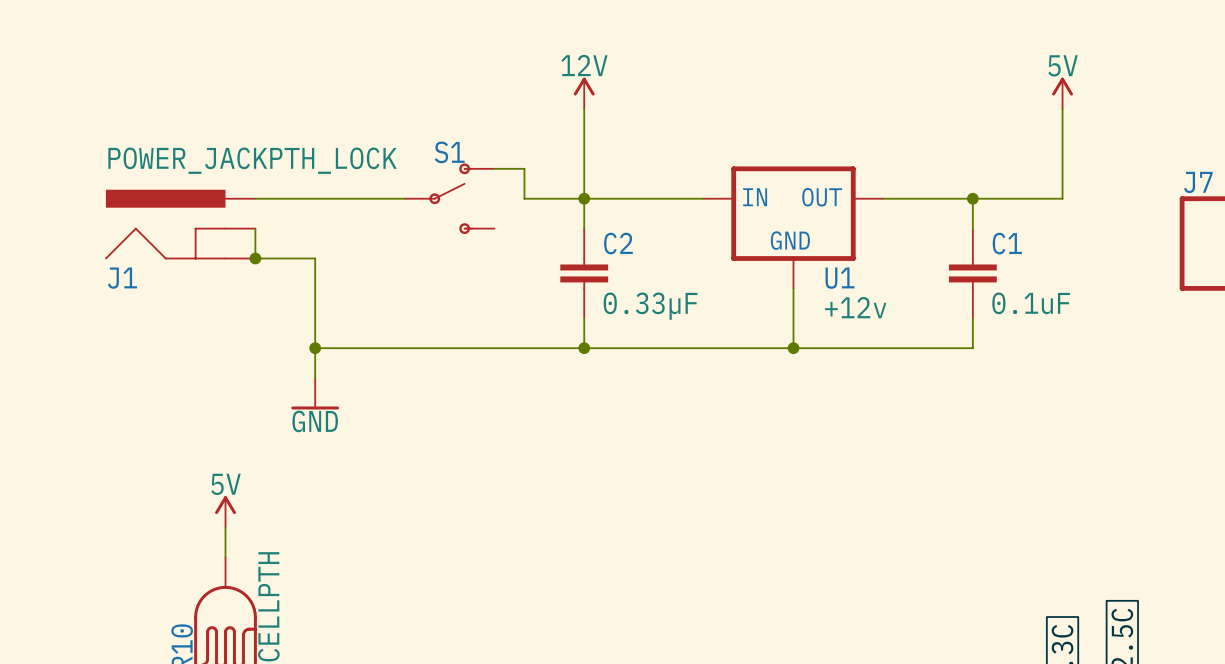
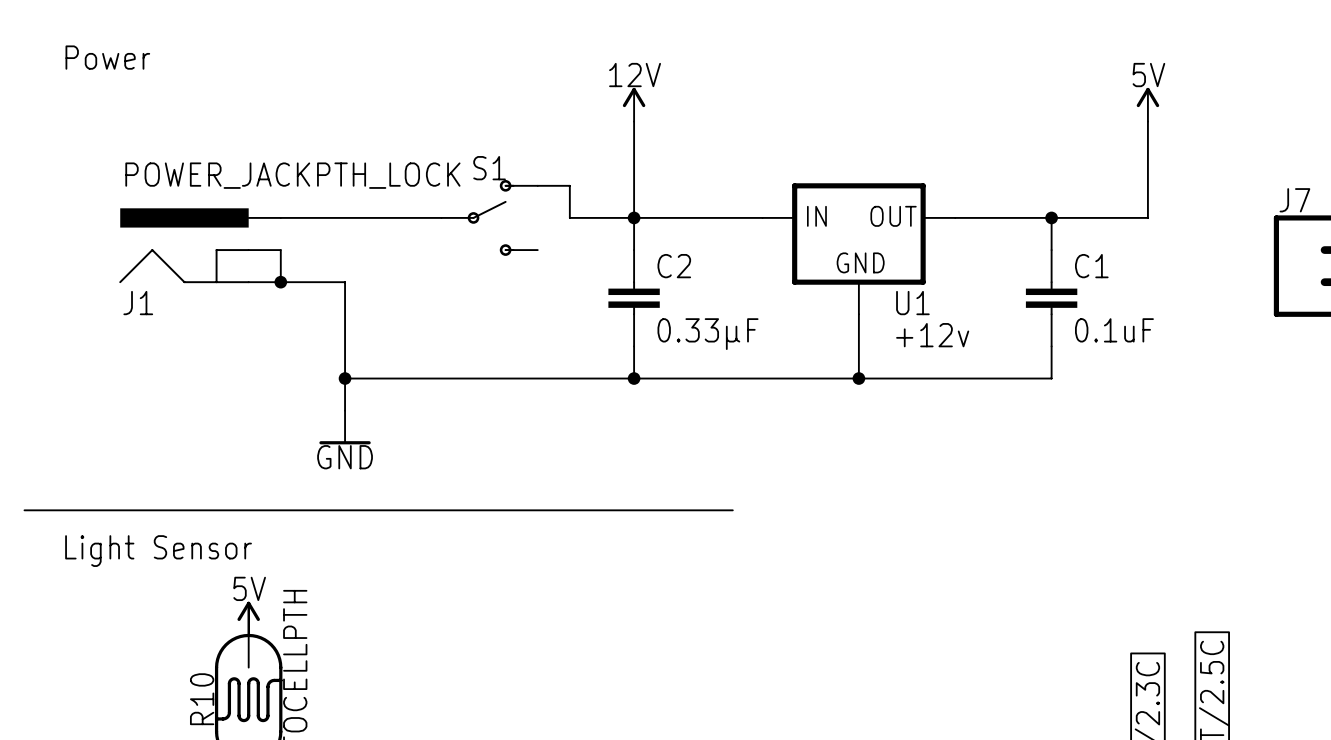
text: none -> Power (107, 57)
line: none -> (24, 510) (732, 510)
text: none -> Light Sensor (158, 551)
power symbol position: 5V (225, 511) -> 5V (248, 618)
wire: (225, 527) (225, 557) -> (248, 635) (248, 667)

